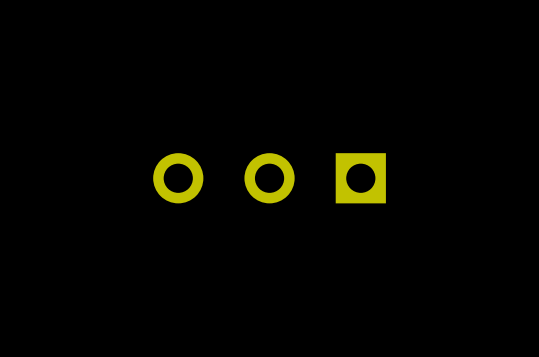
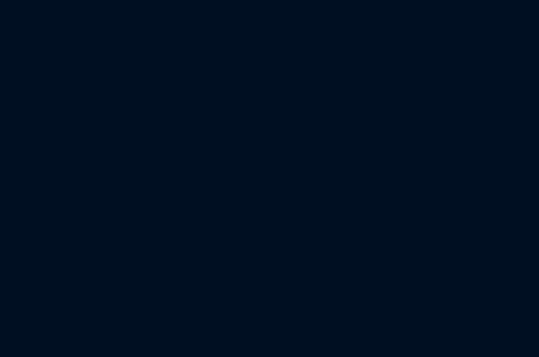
part: (269, 178) -> none

